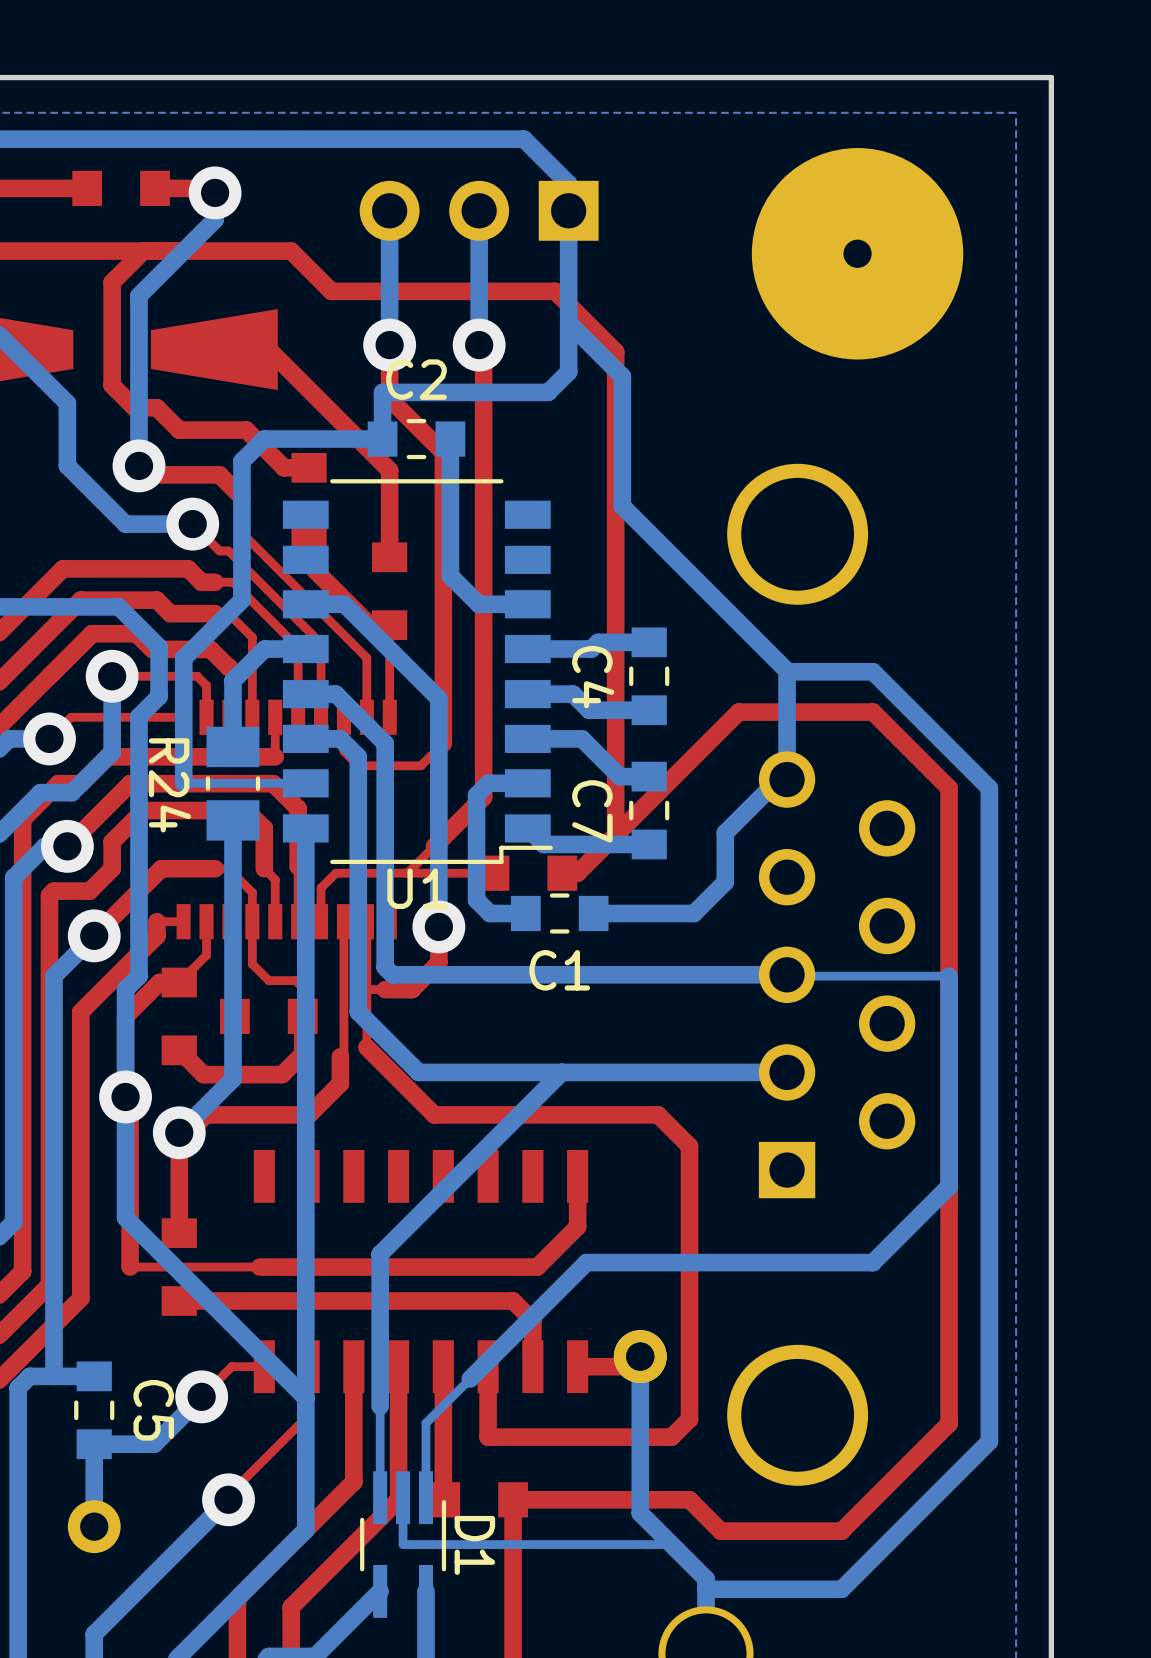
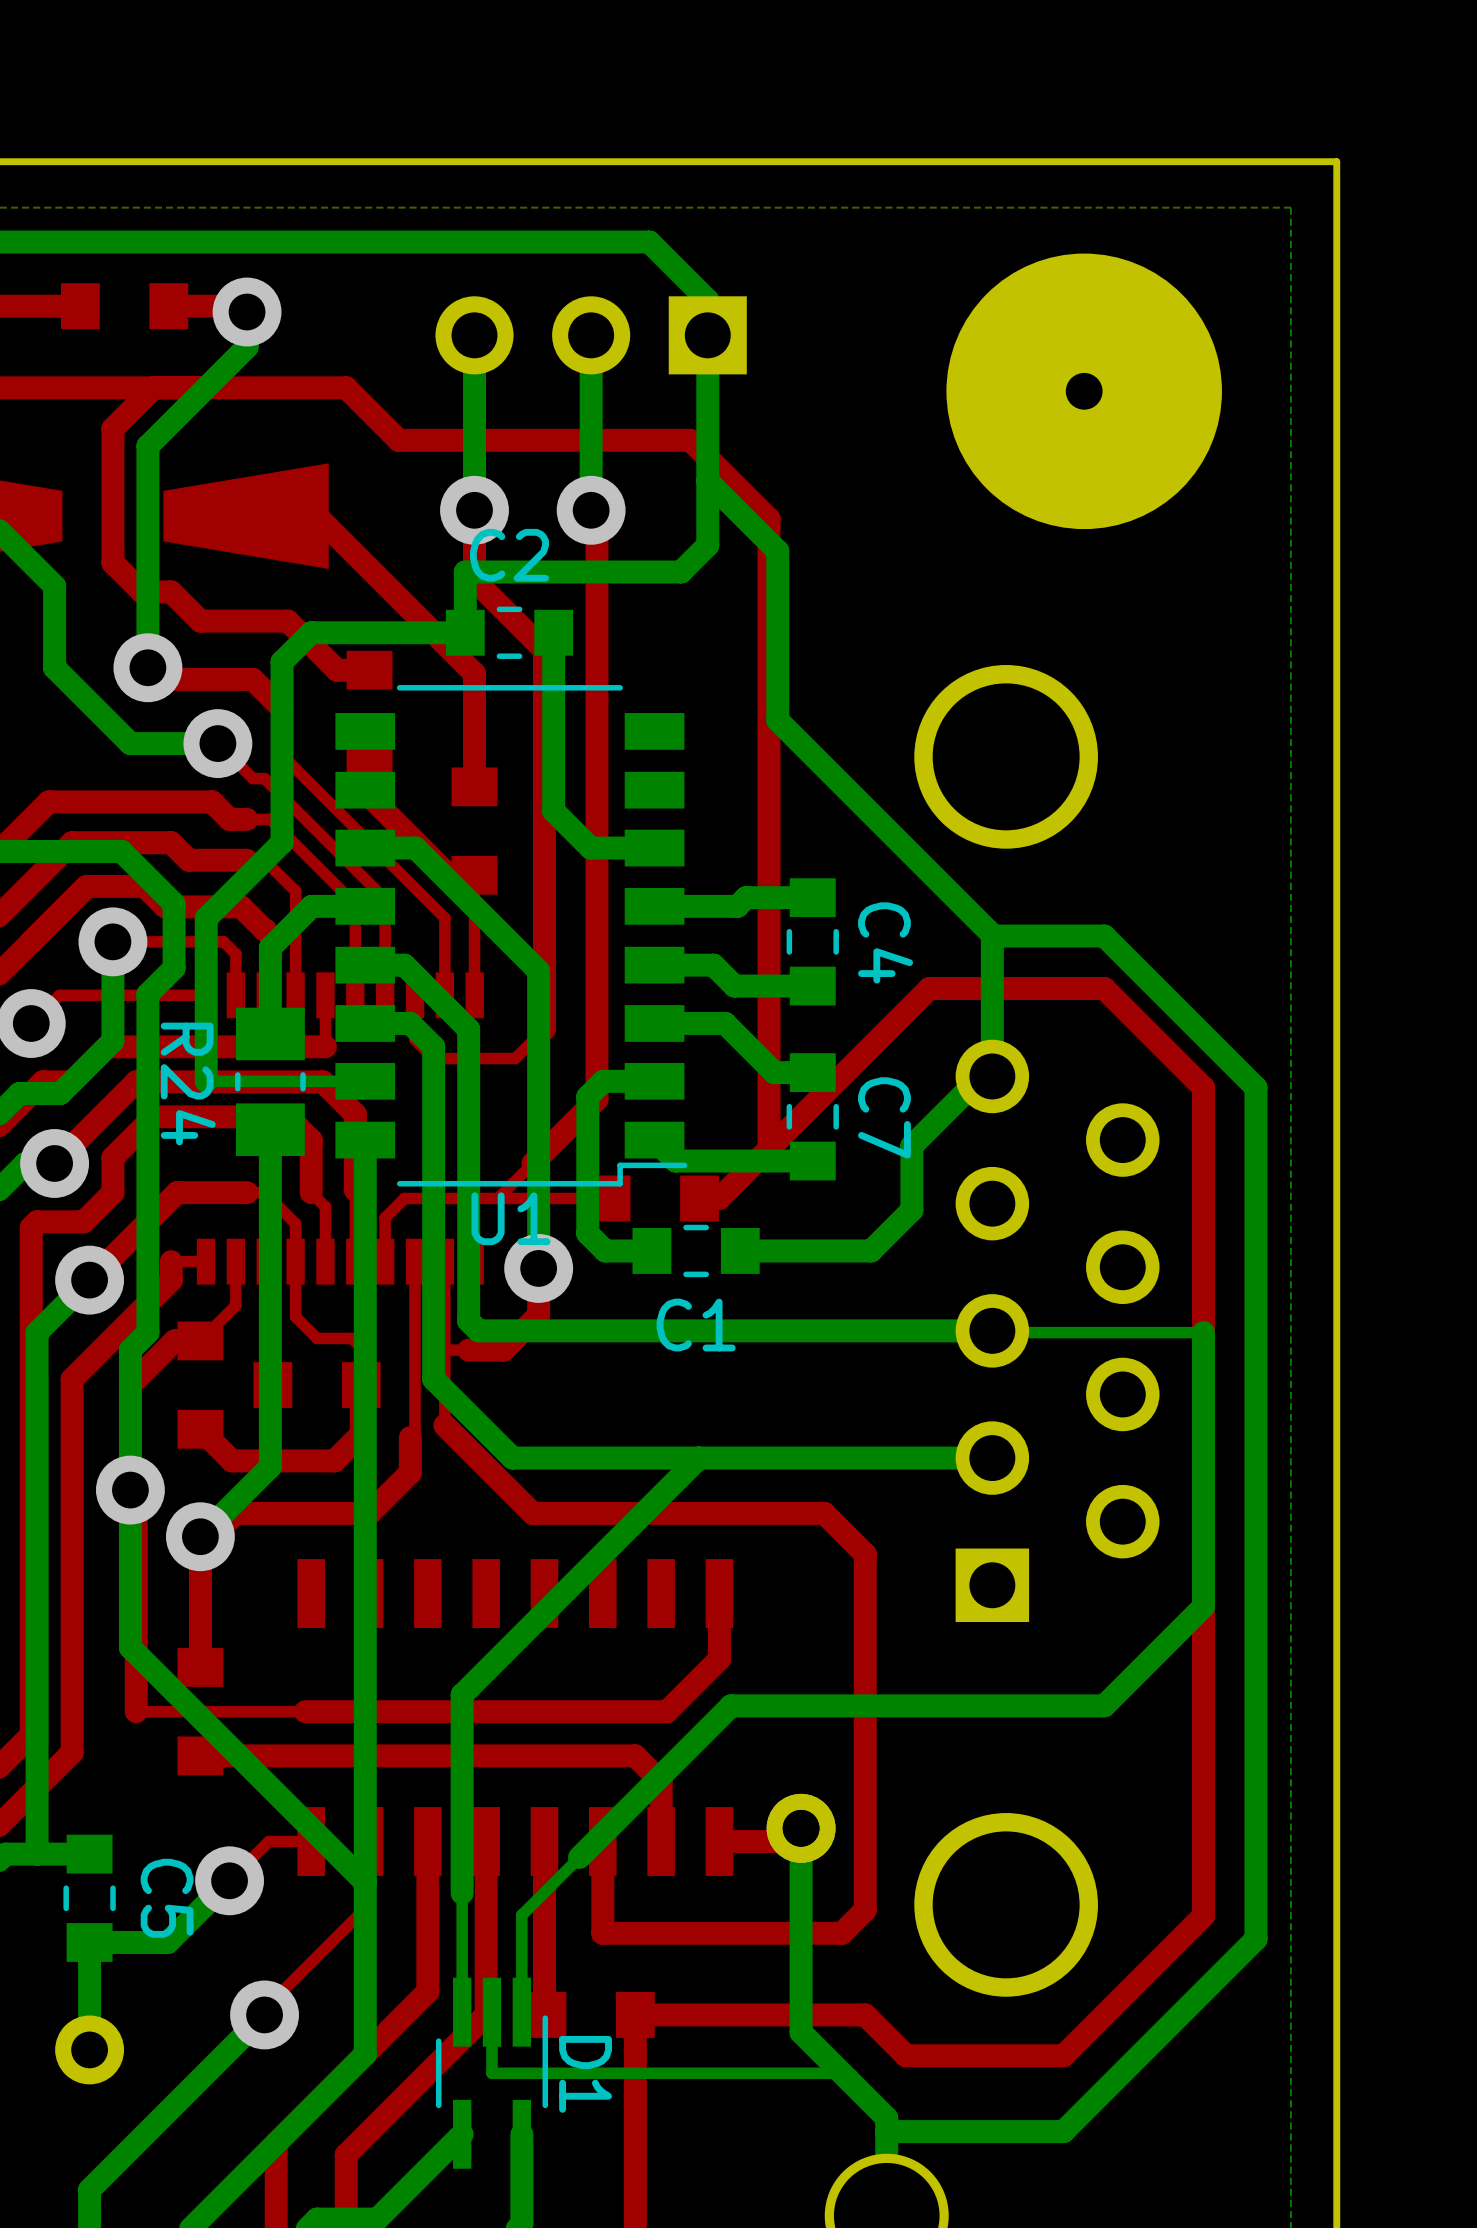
C4 name position: C4 (593, 677) -> C4 (885, 942)
C7 name position: C7 (592, 811) -> C7 (884, 1117)

